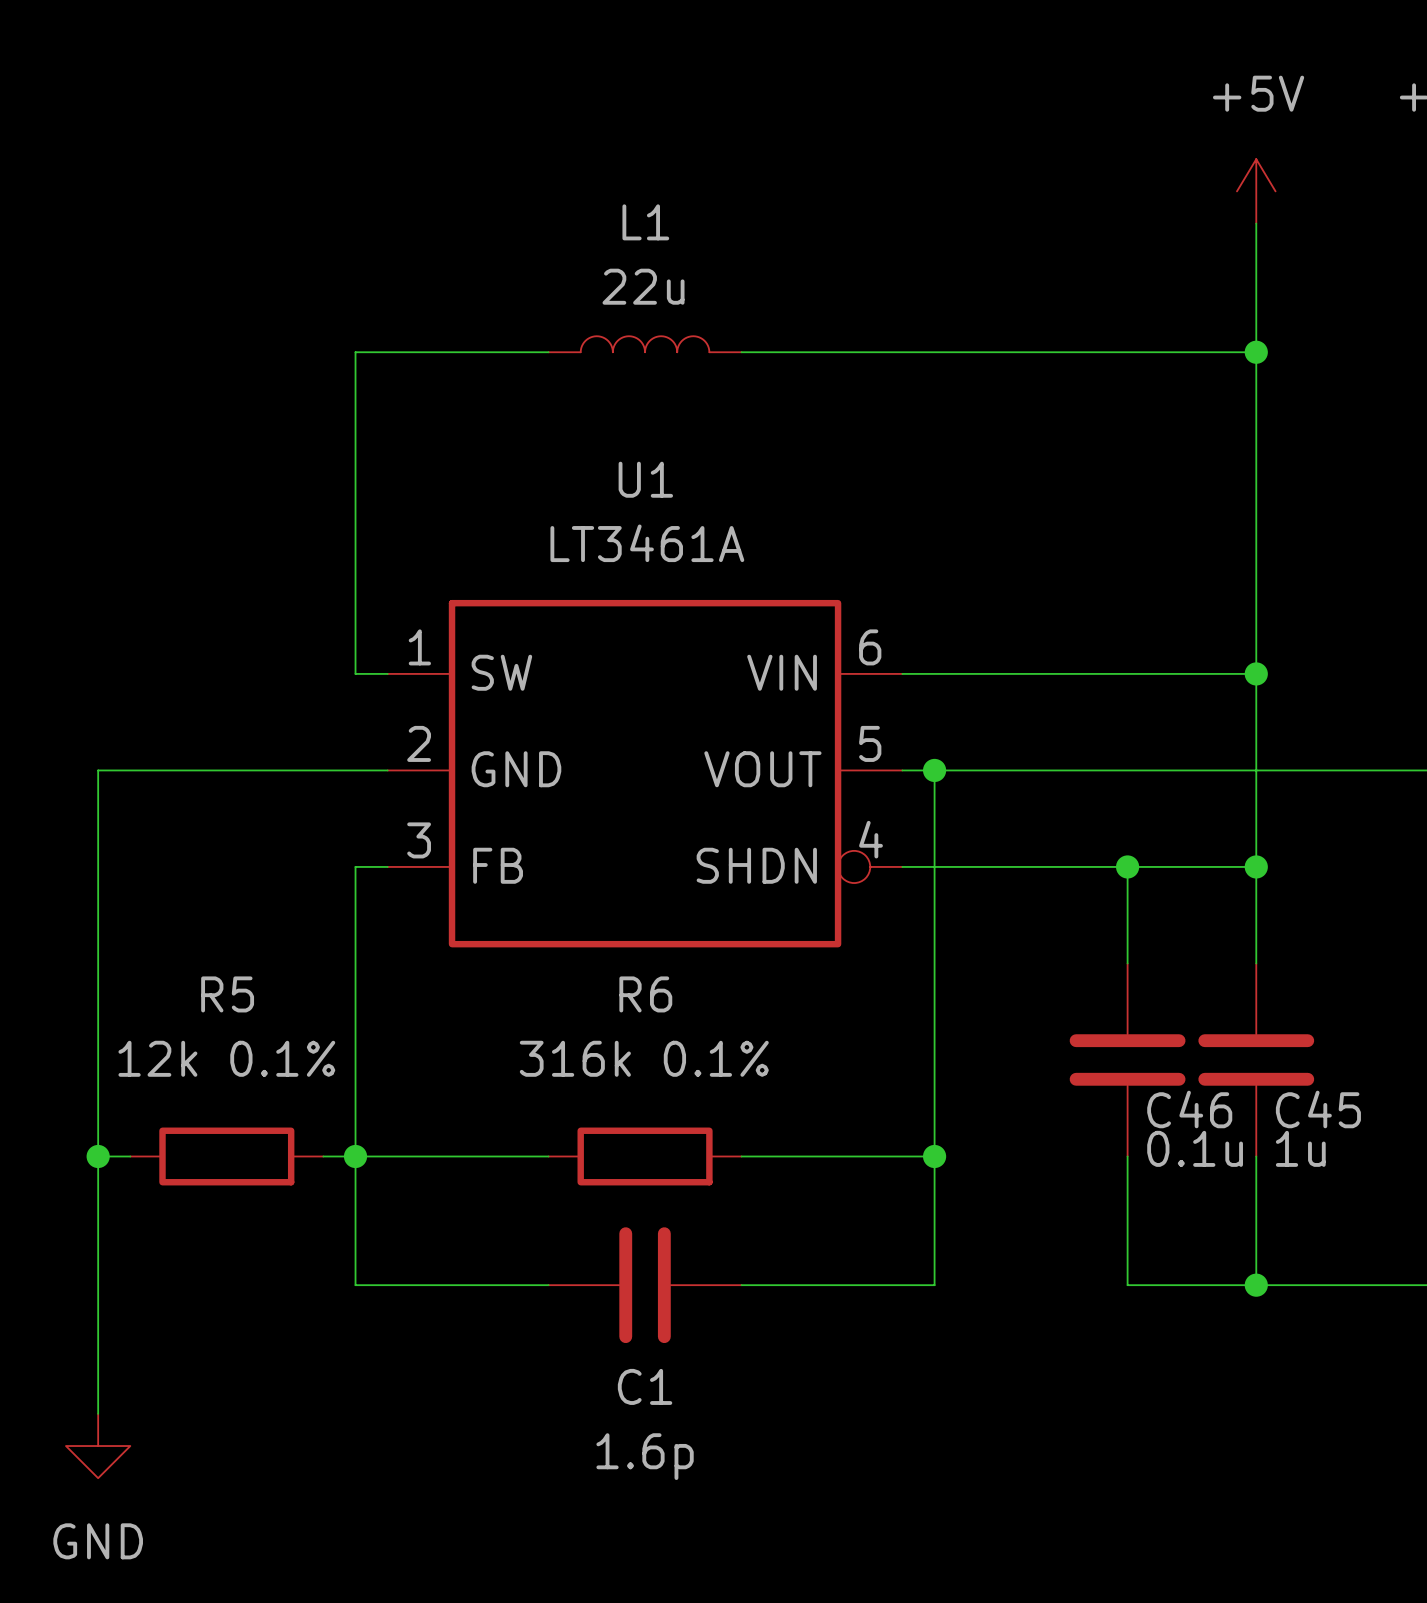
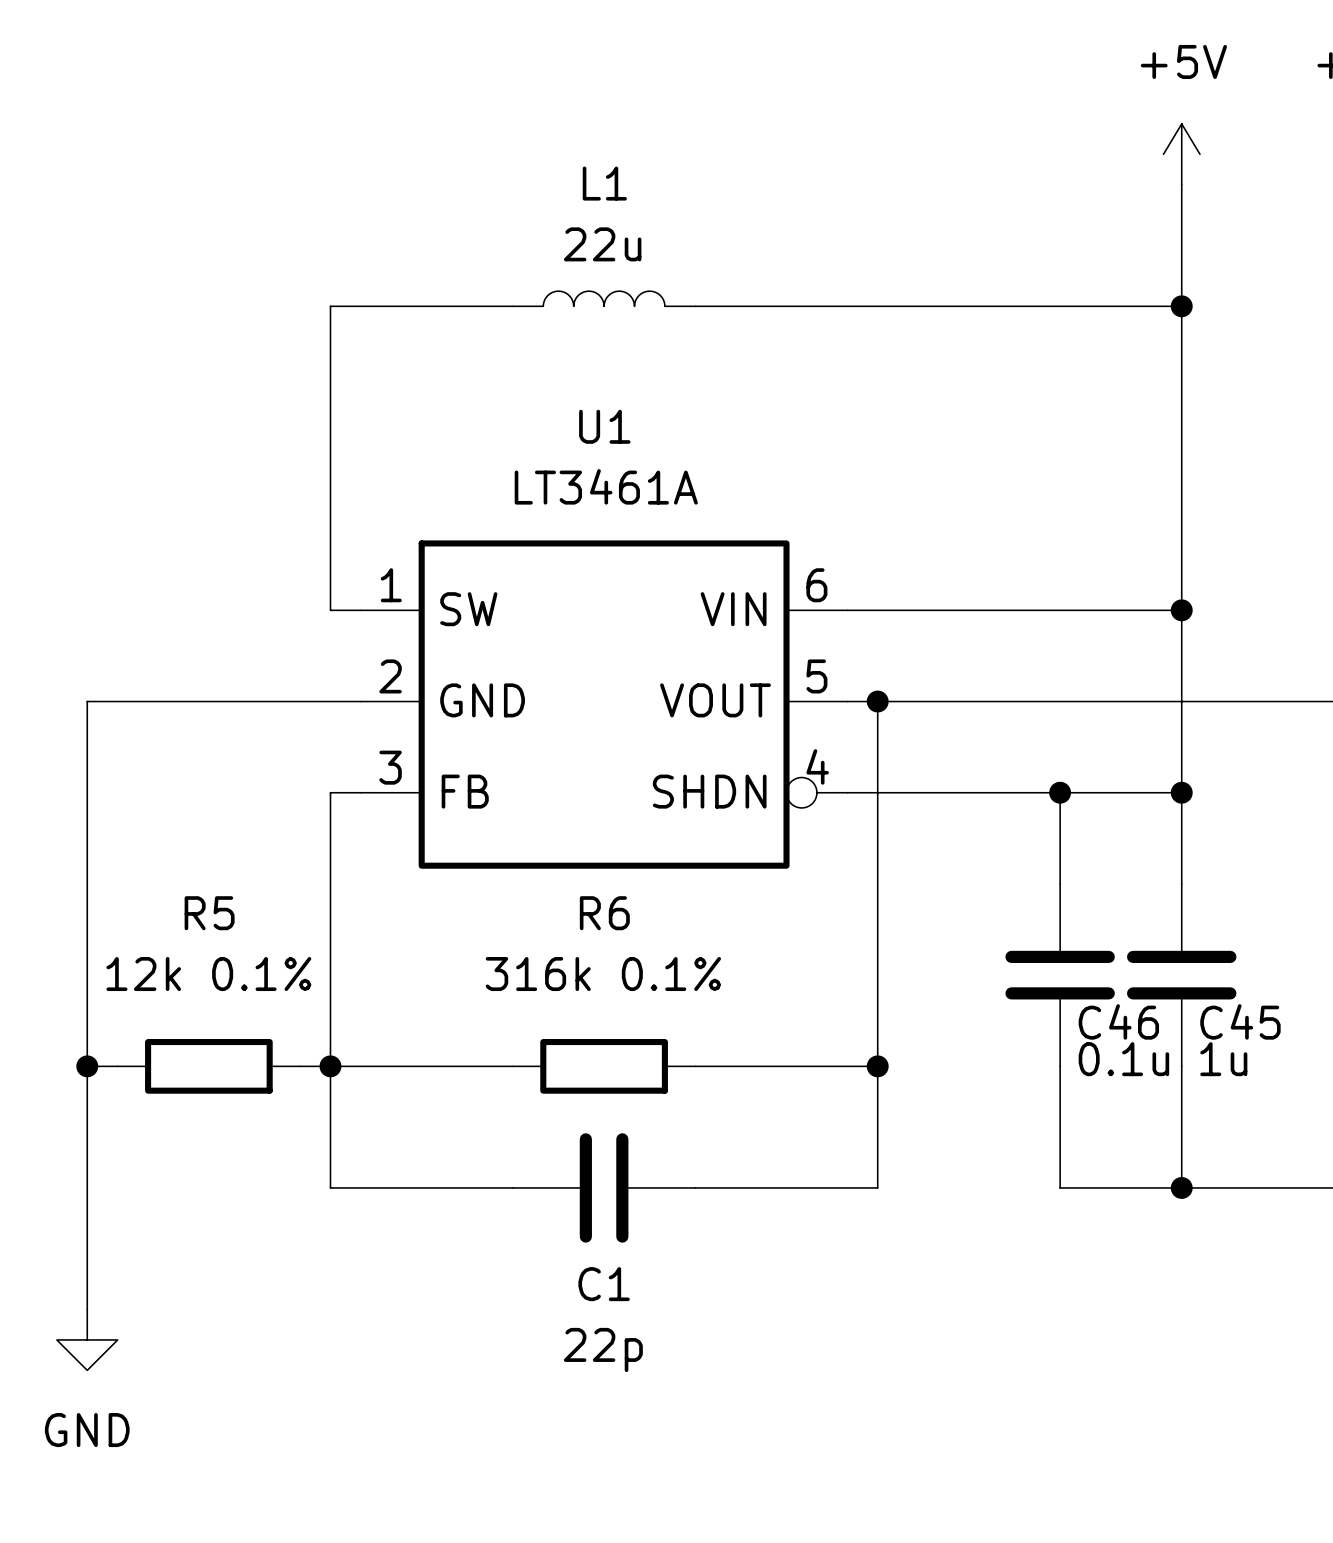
C1 value: 1.6p (645, 1456) -> 22p (603, 1349)

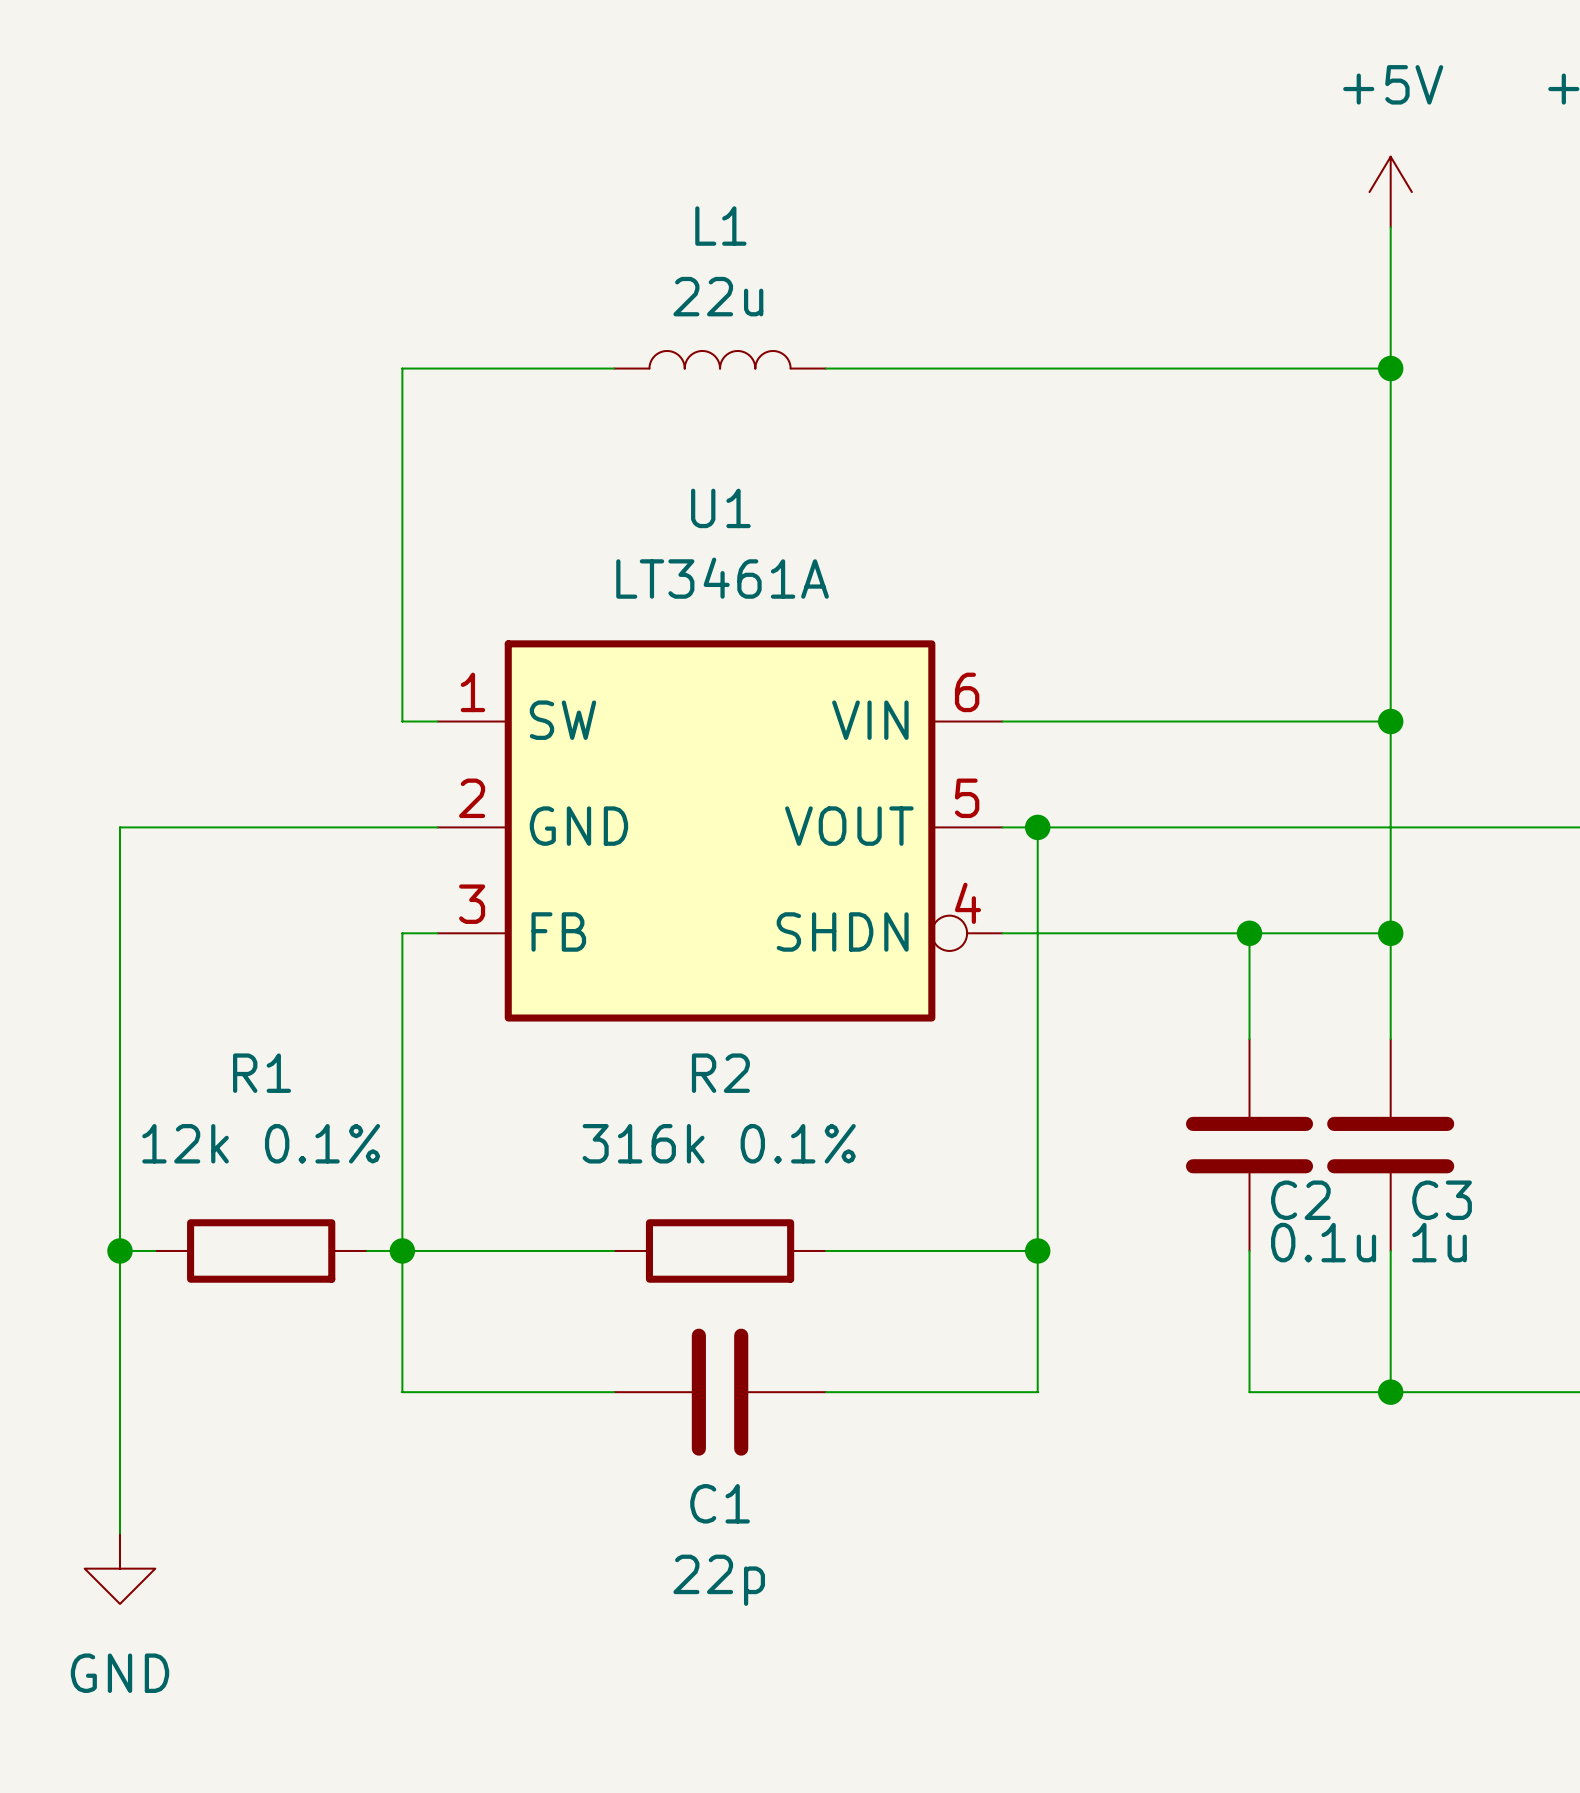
R5 name: R5 (209, 913) -> R1 (262, 1073)
R6 name: R6 (604, 913) -> R2 (720, 1073)
C46 name: C46 (1118, 1021) -> C2 (1300, 1200)
C45 name: C45 (1240, 1021) -> C3 (1442, 1200)

